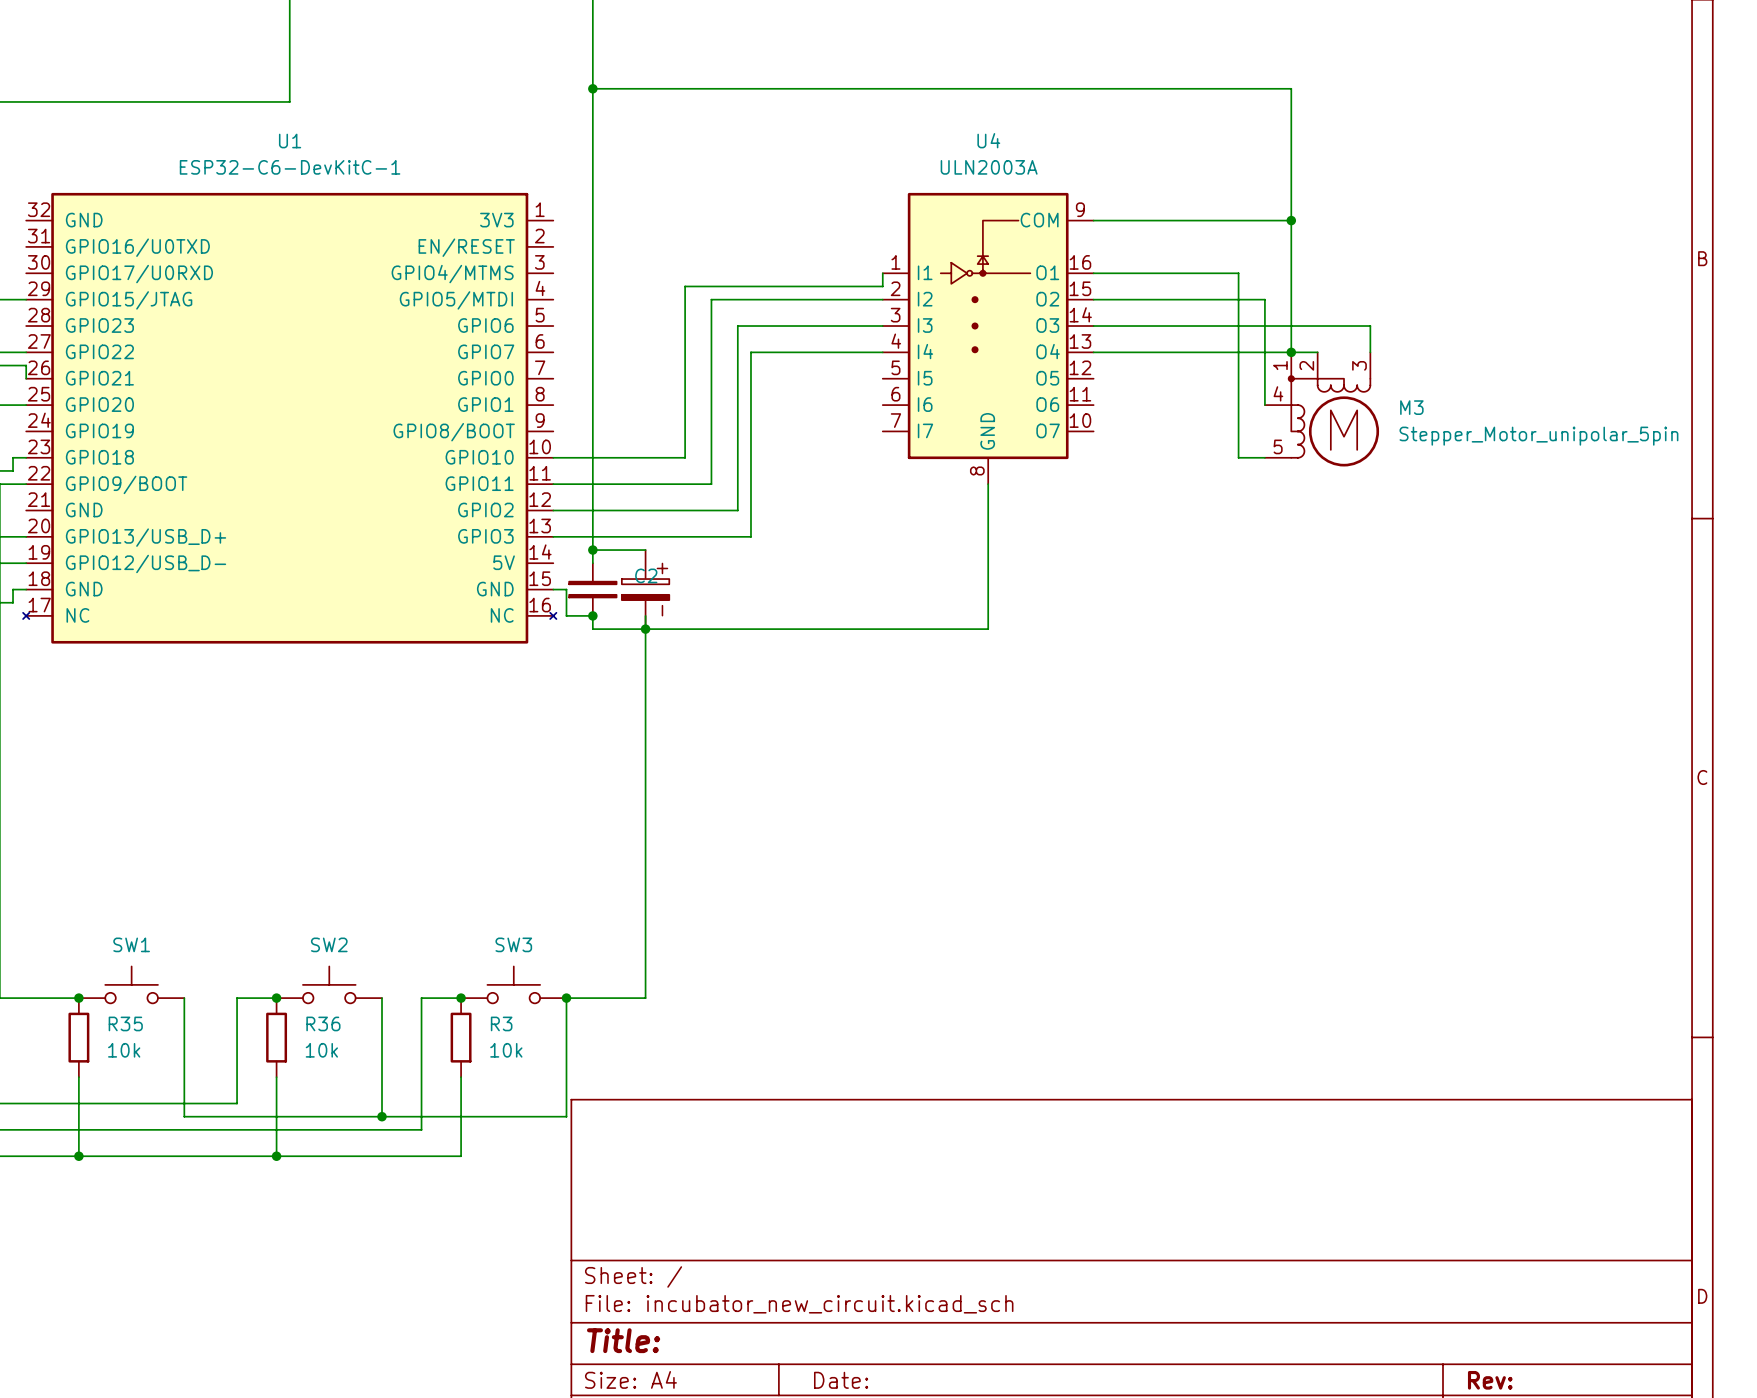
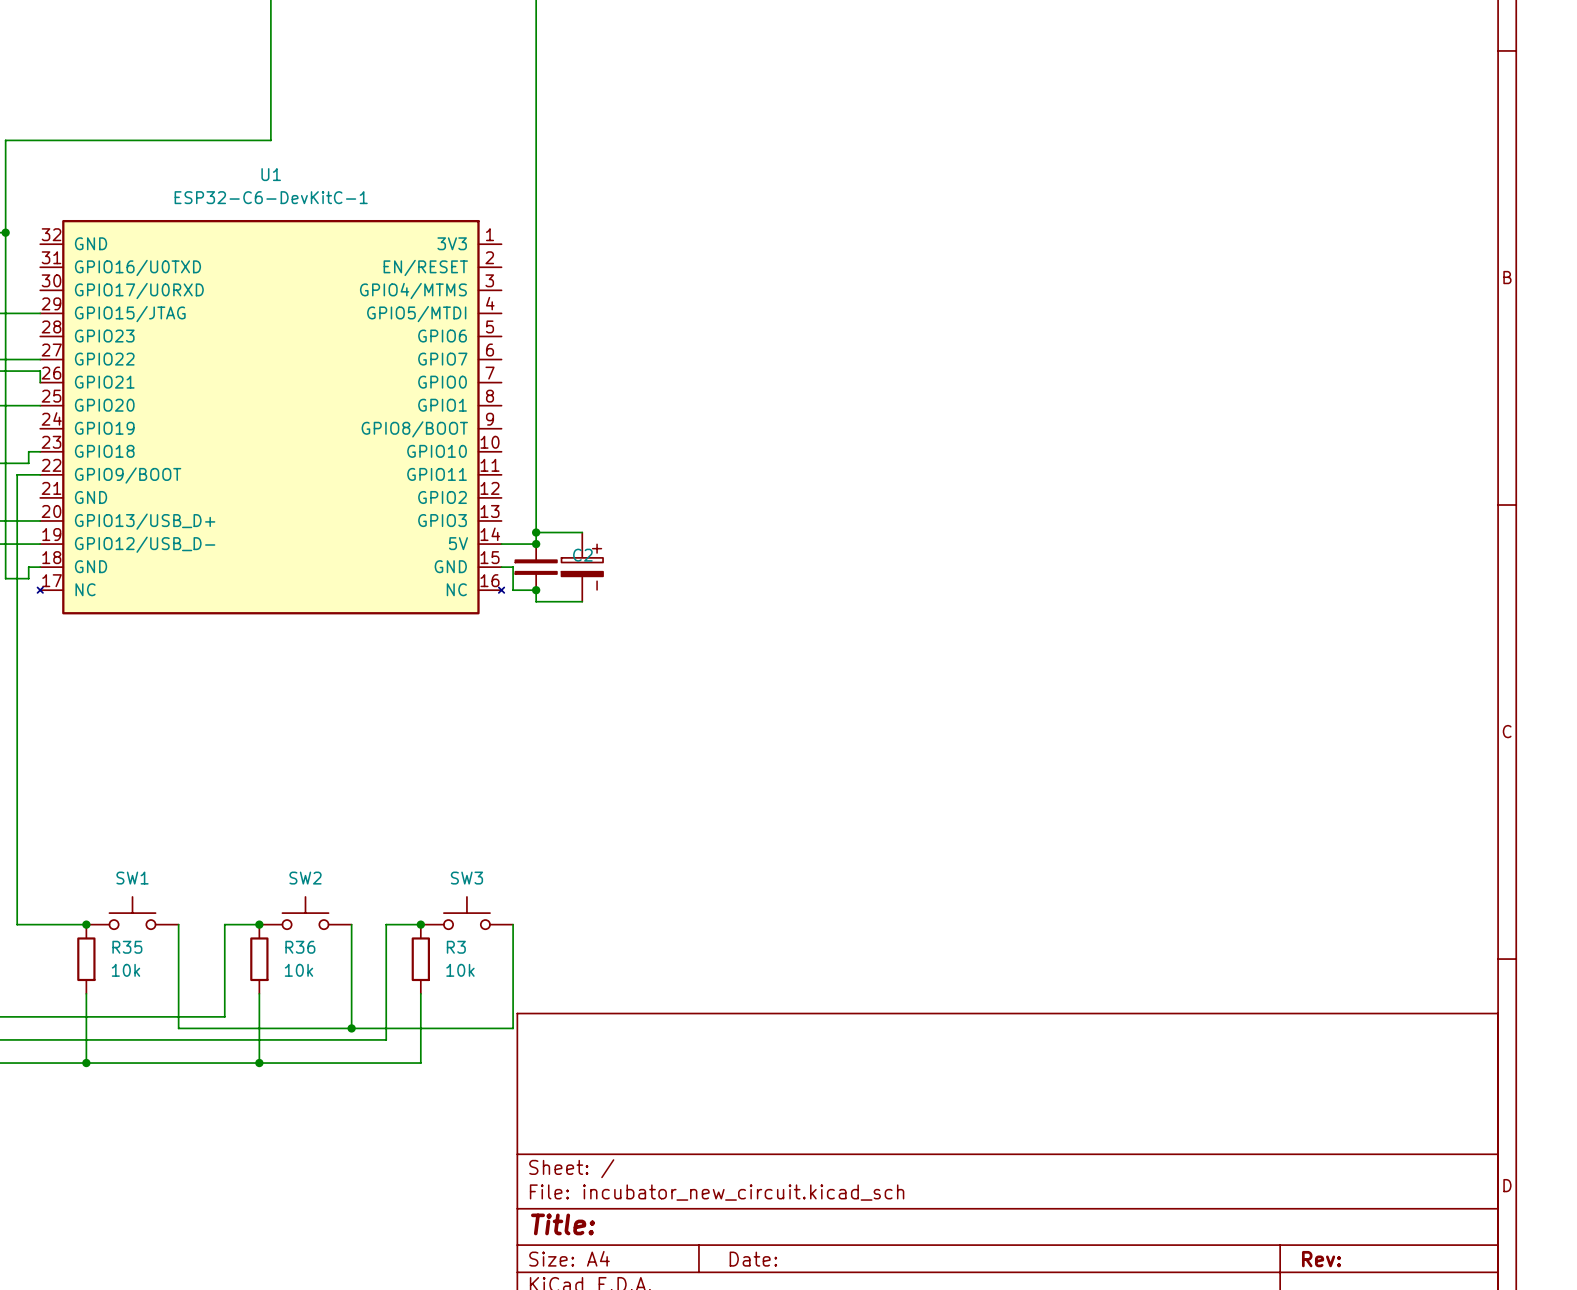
wire: (592, 88) (1291, 88) (1291, 352) -> none
junction: (592, 88) -> none
wire: (1093, 220) (1291, 220) -> none
junction: (1291, 220) -> none
wire: (882, 273) (882, 286) (685, 286) (685, 457) (553, 457) -> none
wire: (1093, 273) (1238, 273) (1238, 457) (1264, 457) -> none
wire: (882, 299) (711, 299) (711, 484) (553, 484) -> none
wire: (1093, 299) (1264, 299) (1264, 405) -> none
wire: (882, 326) (737, 326) (737, 510) (553, 510) -> none
wire: (1093, 326) (1370, 326) (1370, 352) -> none
U4: ULN2003A (988, 338) -> none
wire: (882, 352) (750, 352) (750, 536) (553, 536) -> none
wire: (1093, 352) (1317, 352) -> none
junction: (1291, 352) -> none
M3: Stepper_Motor_unipolar_5pin (1321, 409) -> none
wire: (988, 484) (988, 629) (645, 629) -> none
wire: none -> (501, 544) (536, 544)
junction: none -> (536, 544)
wire: (645, 615) (645, 998) (566, 998) -> none
junction: (645, 629) -> none
junction: (566, 998) -> none

